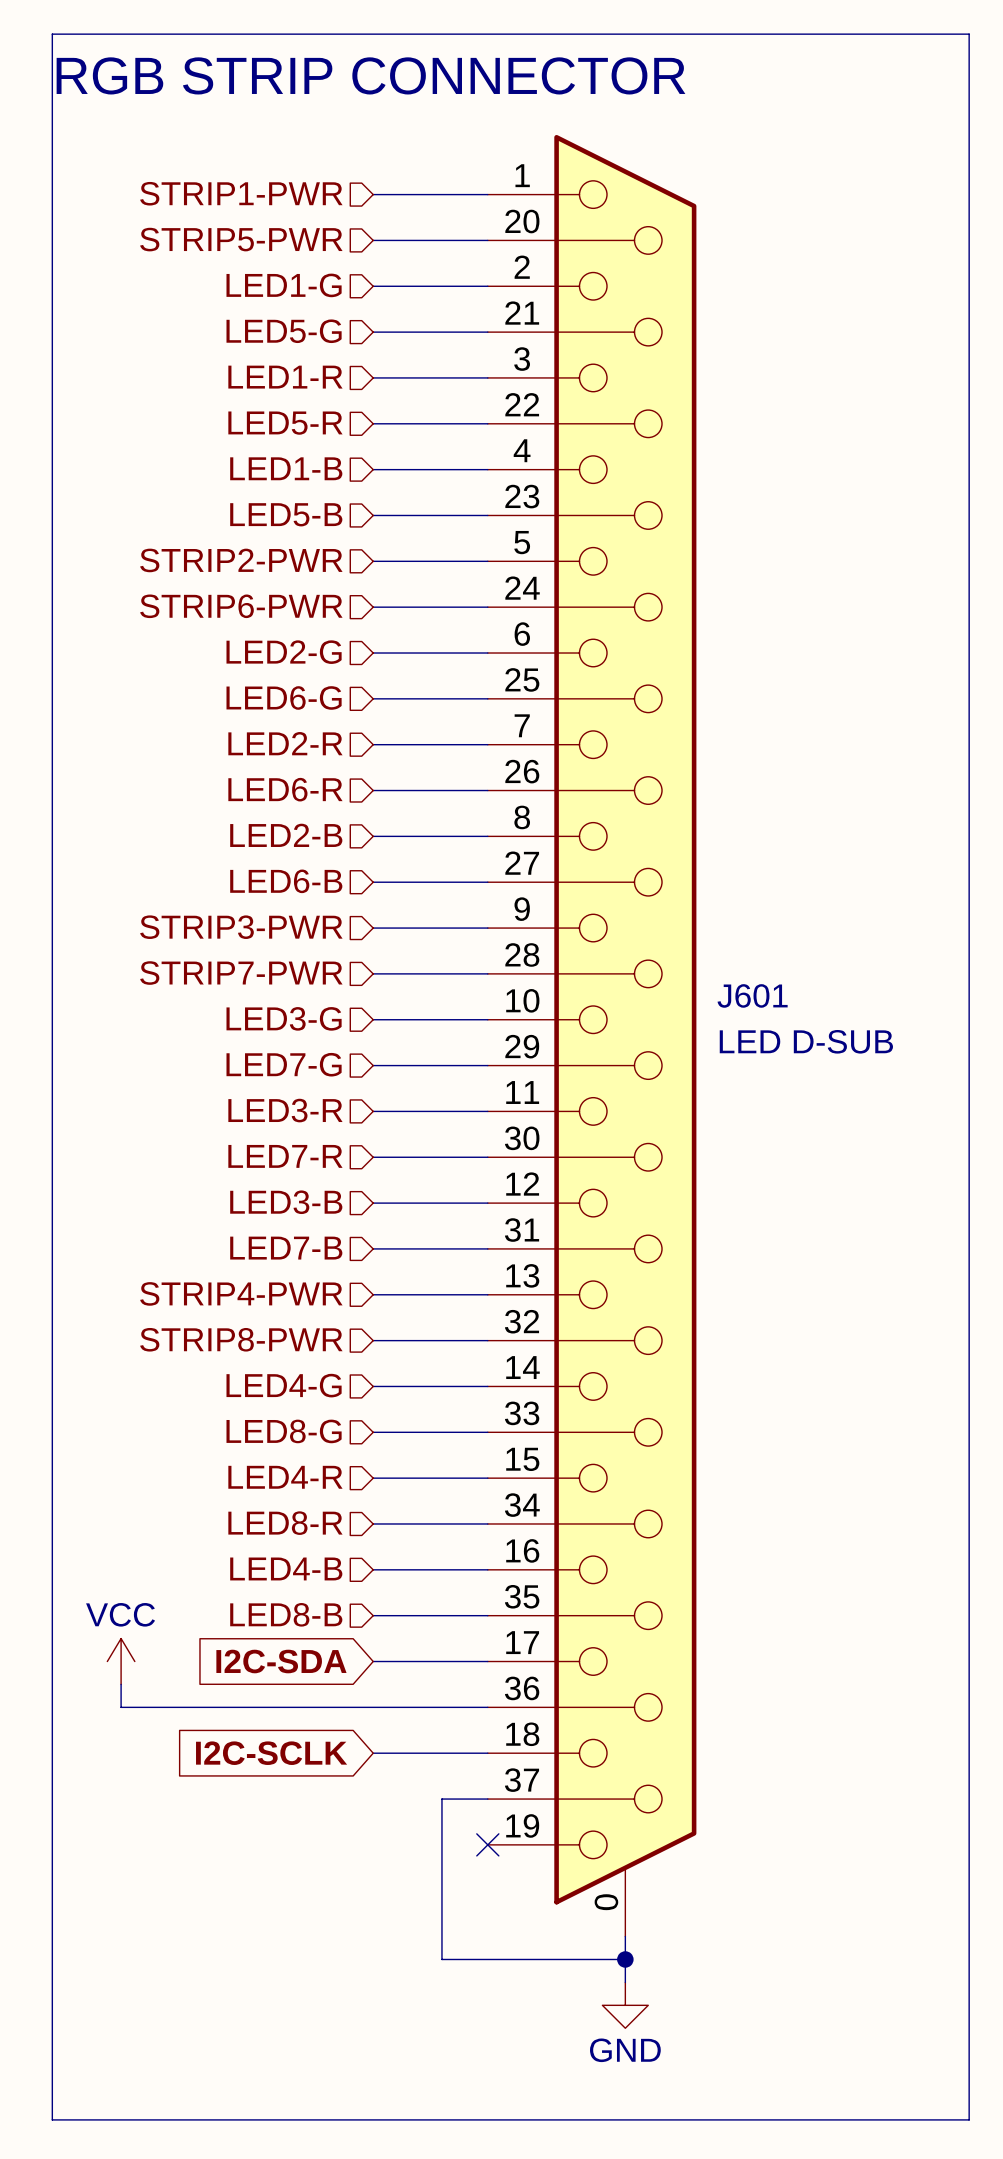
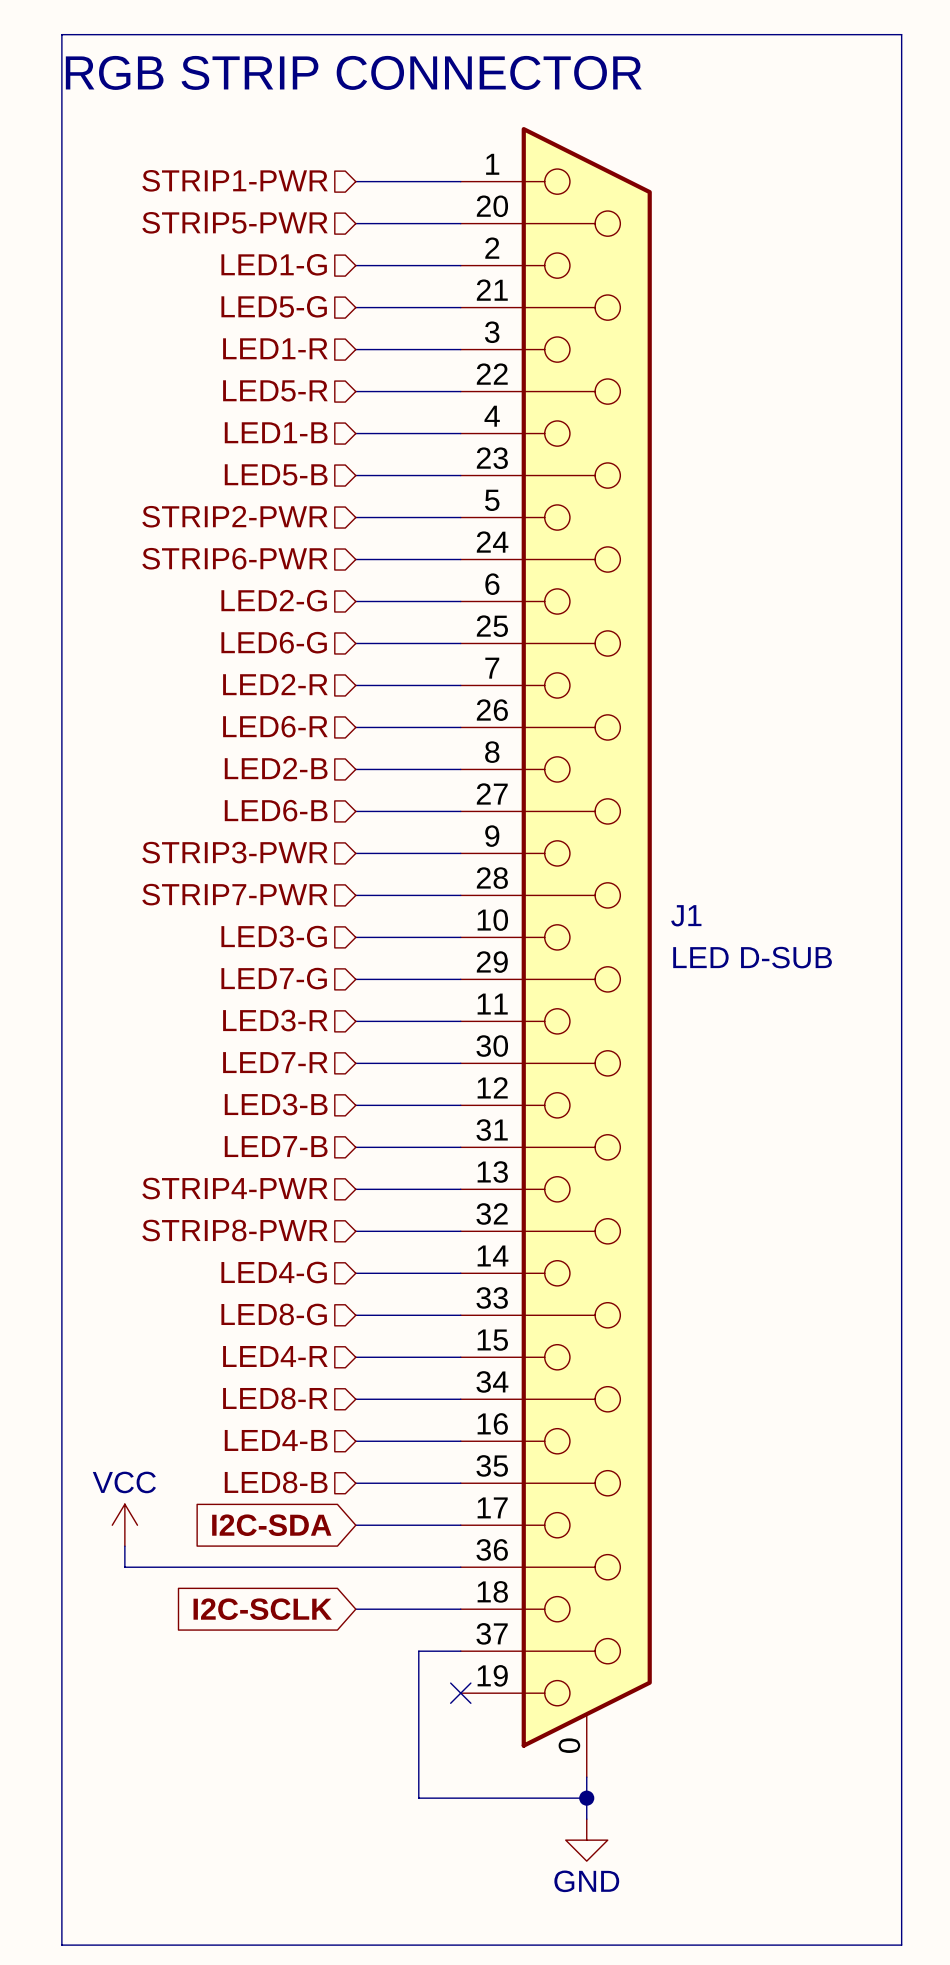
J601 name: J601 (752, 995) -> J1 (686, 915)

